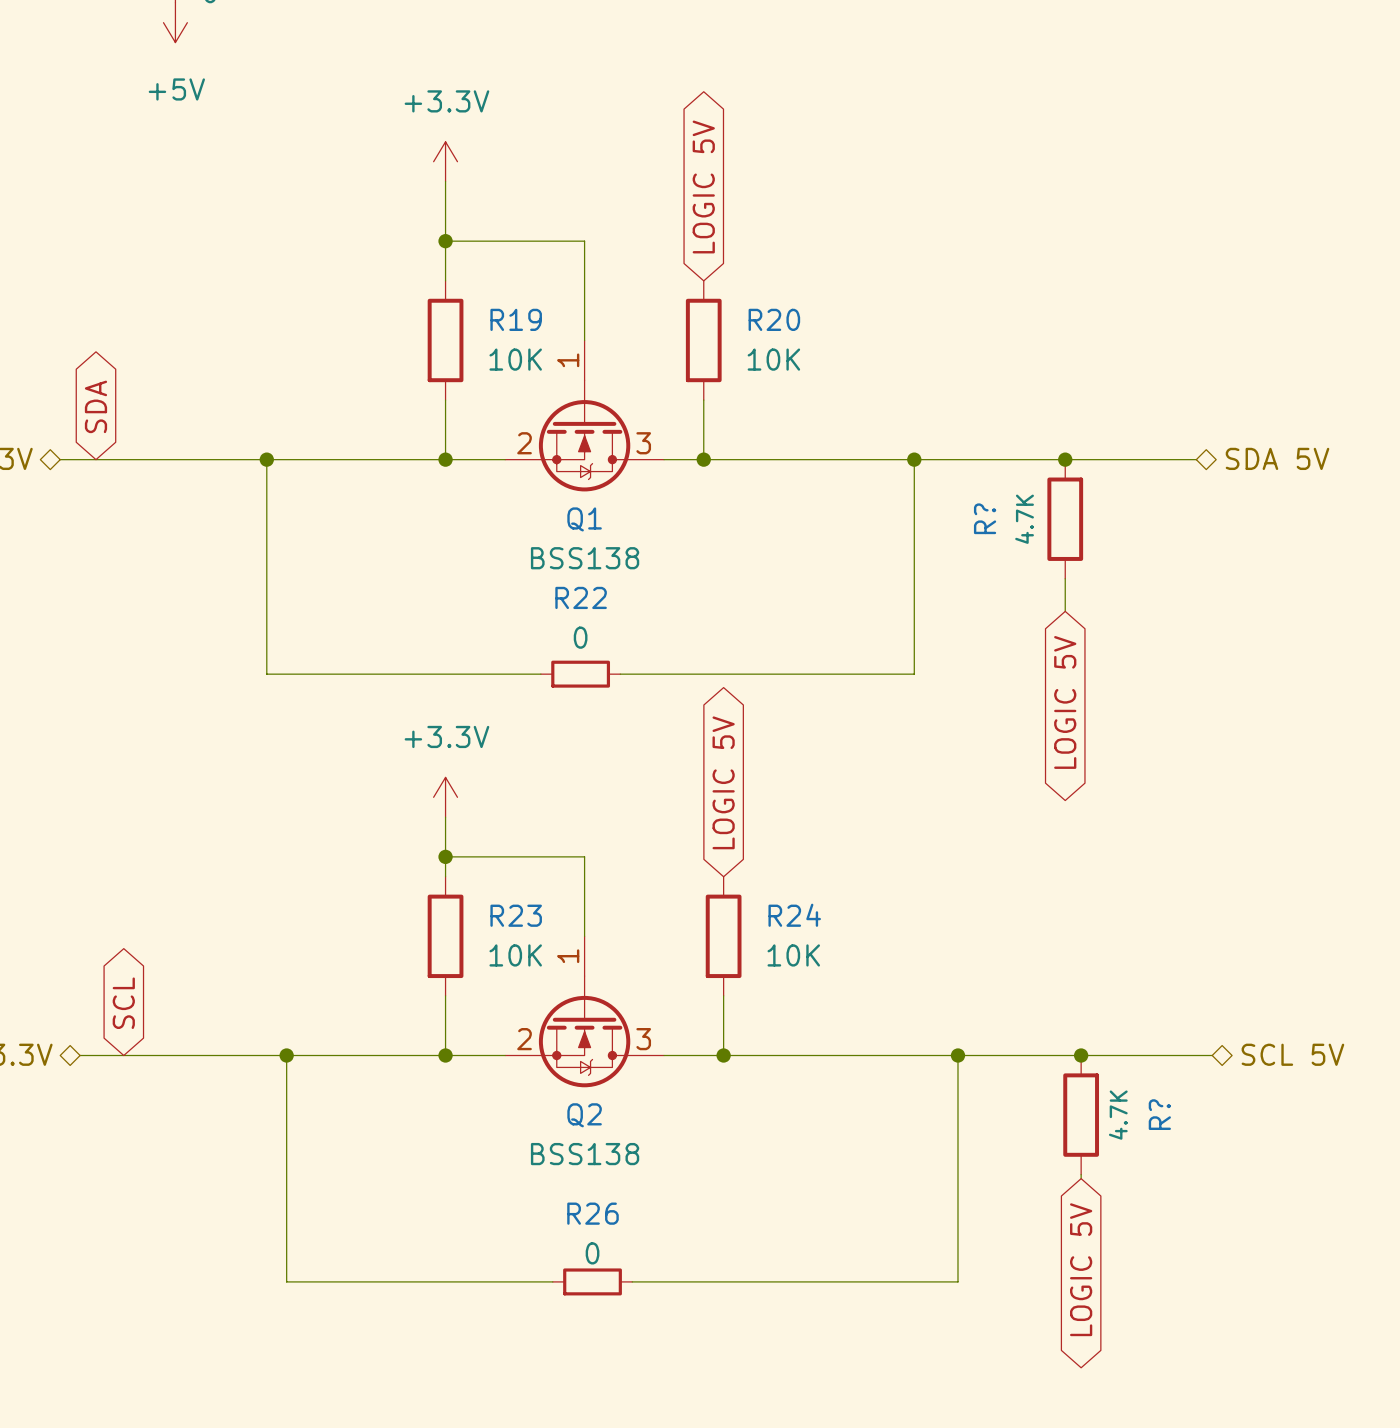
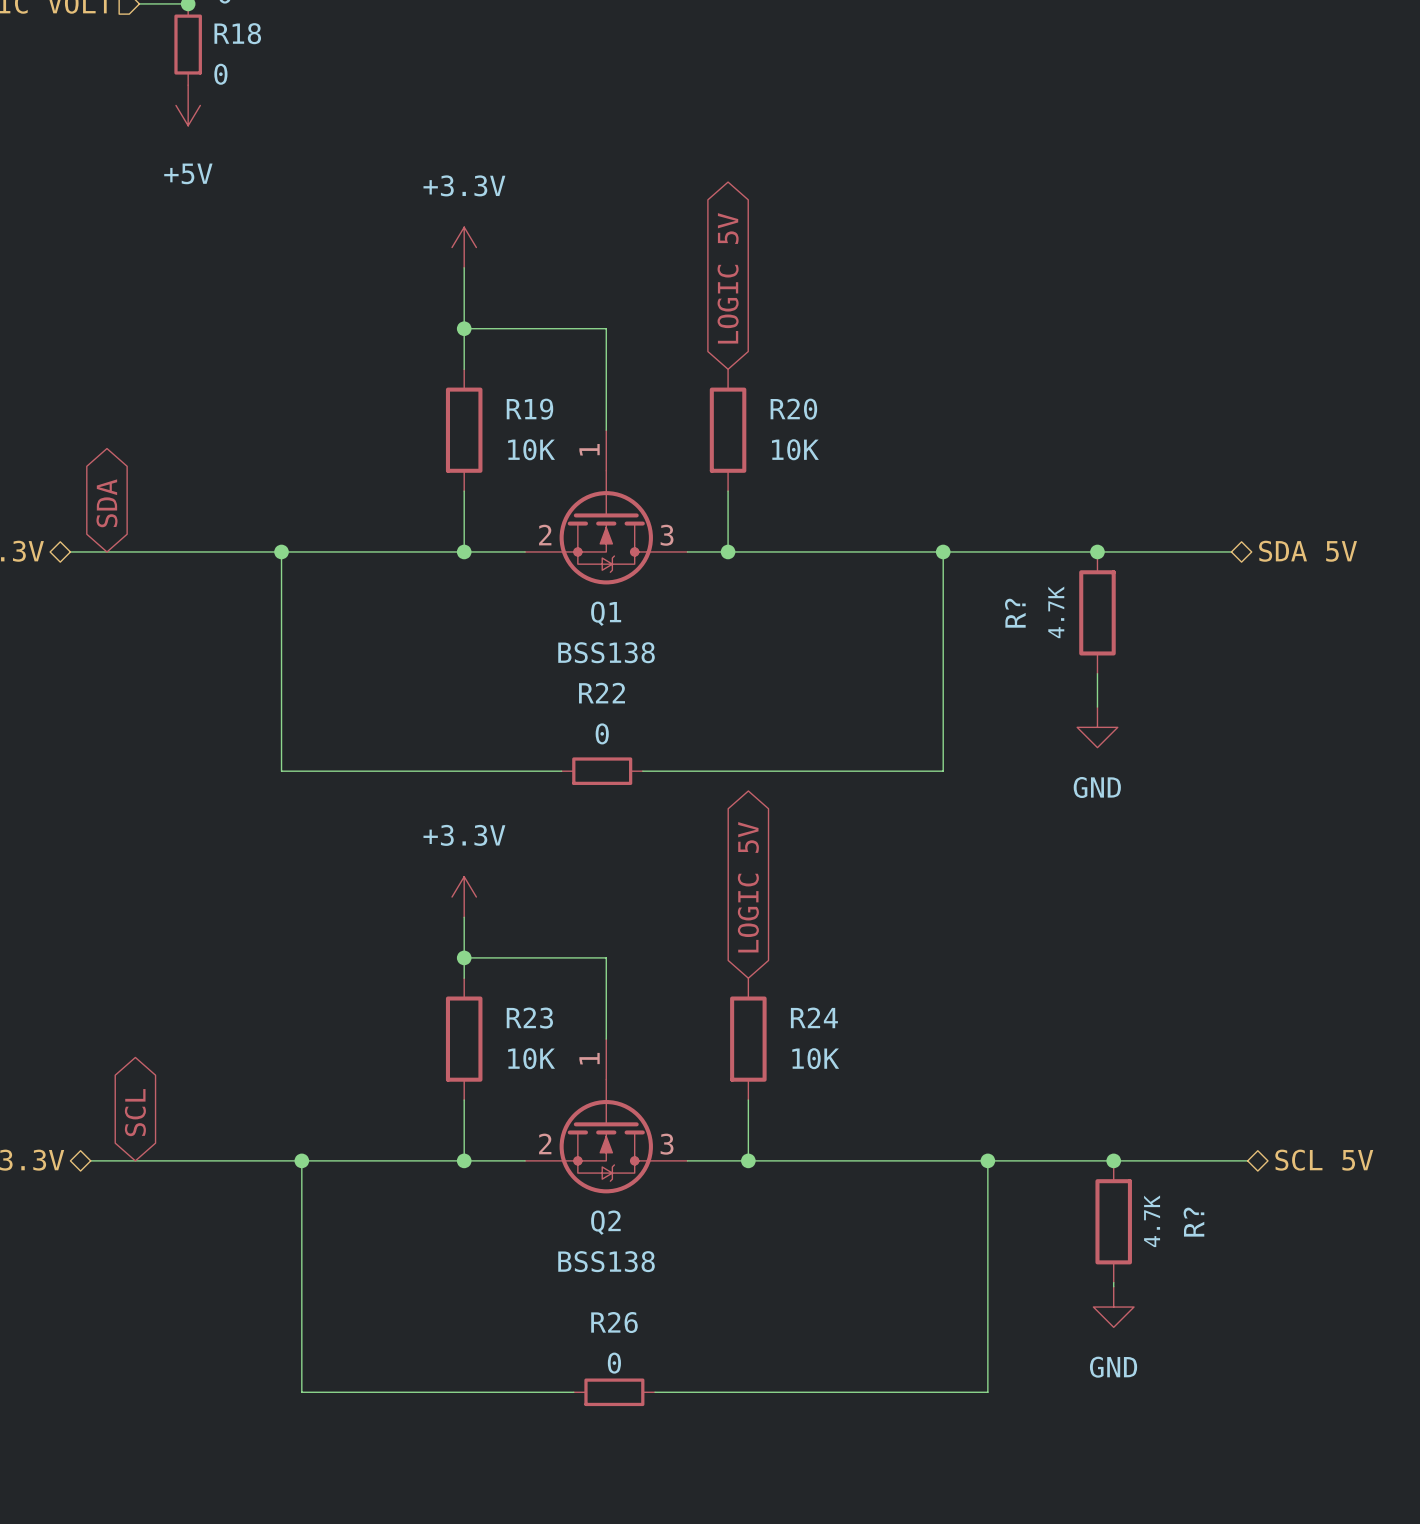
power symbol: none -> GND (1097, 727)
global label: LOGIC 5V (1065, 702) -> none
power symbol: none -> GND (1113, 1307)
global label: LOGIC 5V (1081, 1269) -> none

